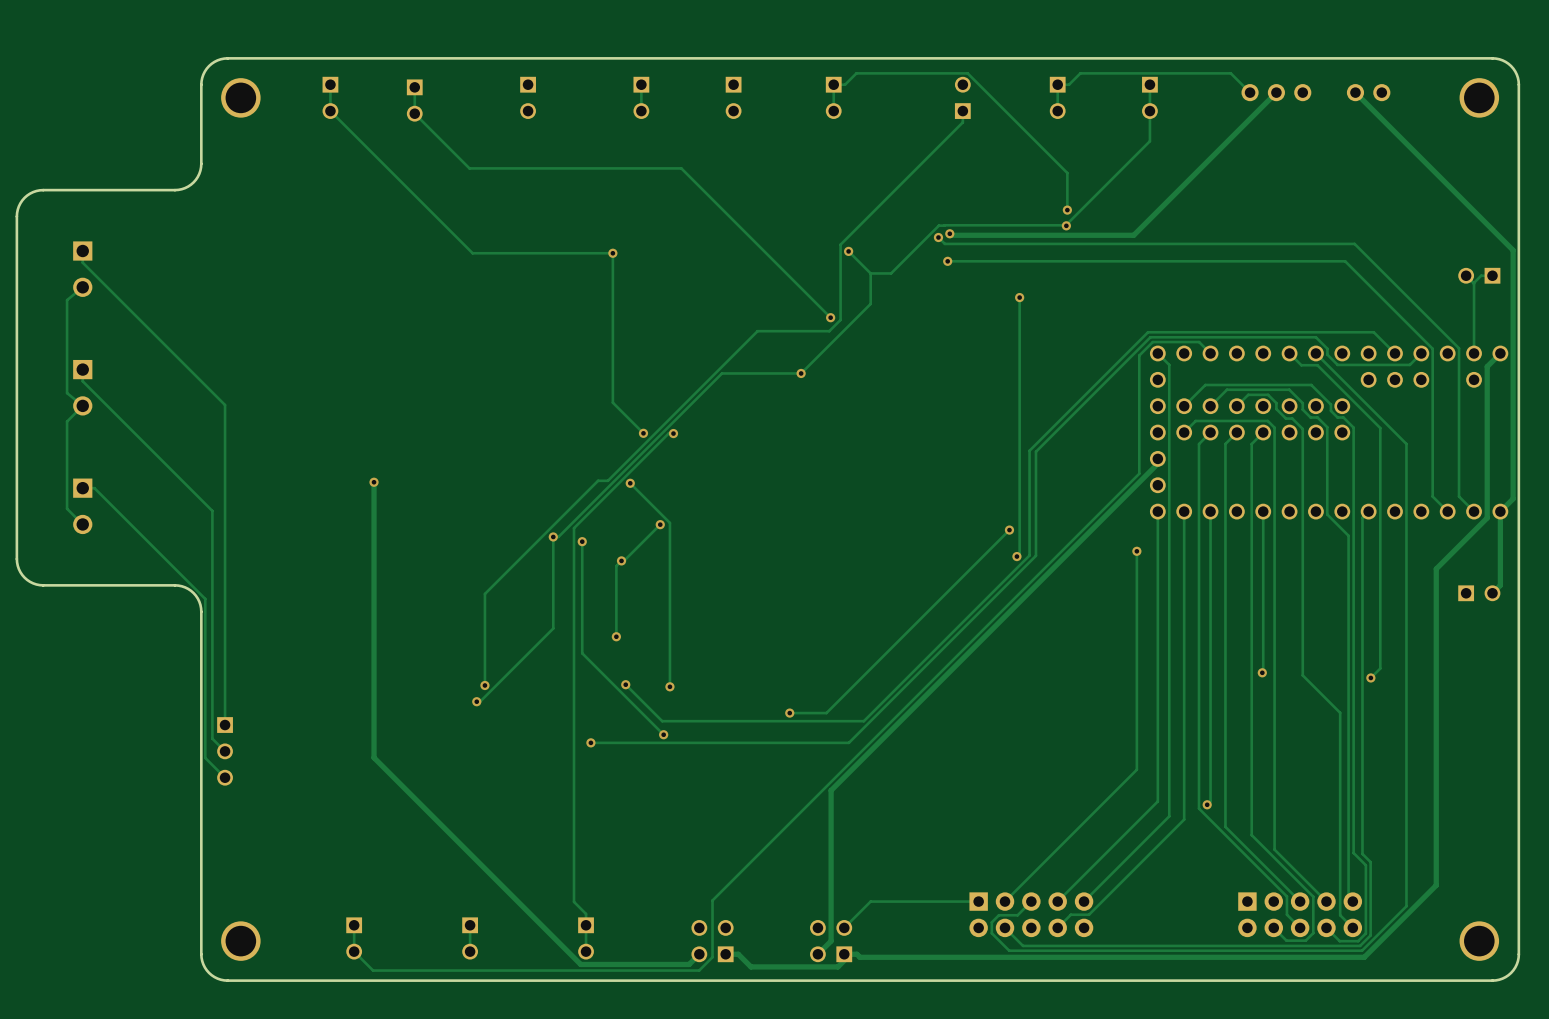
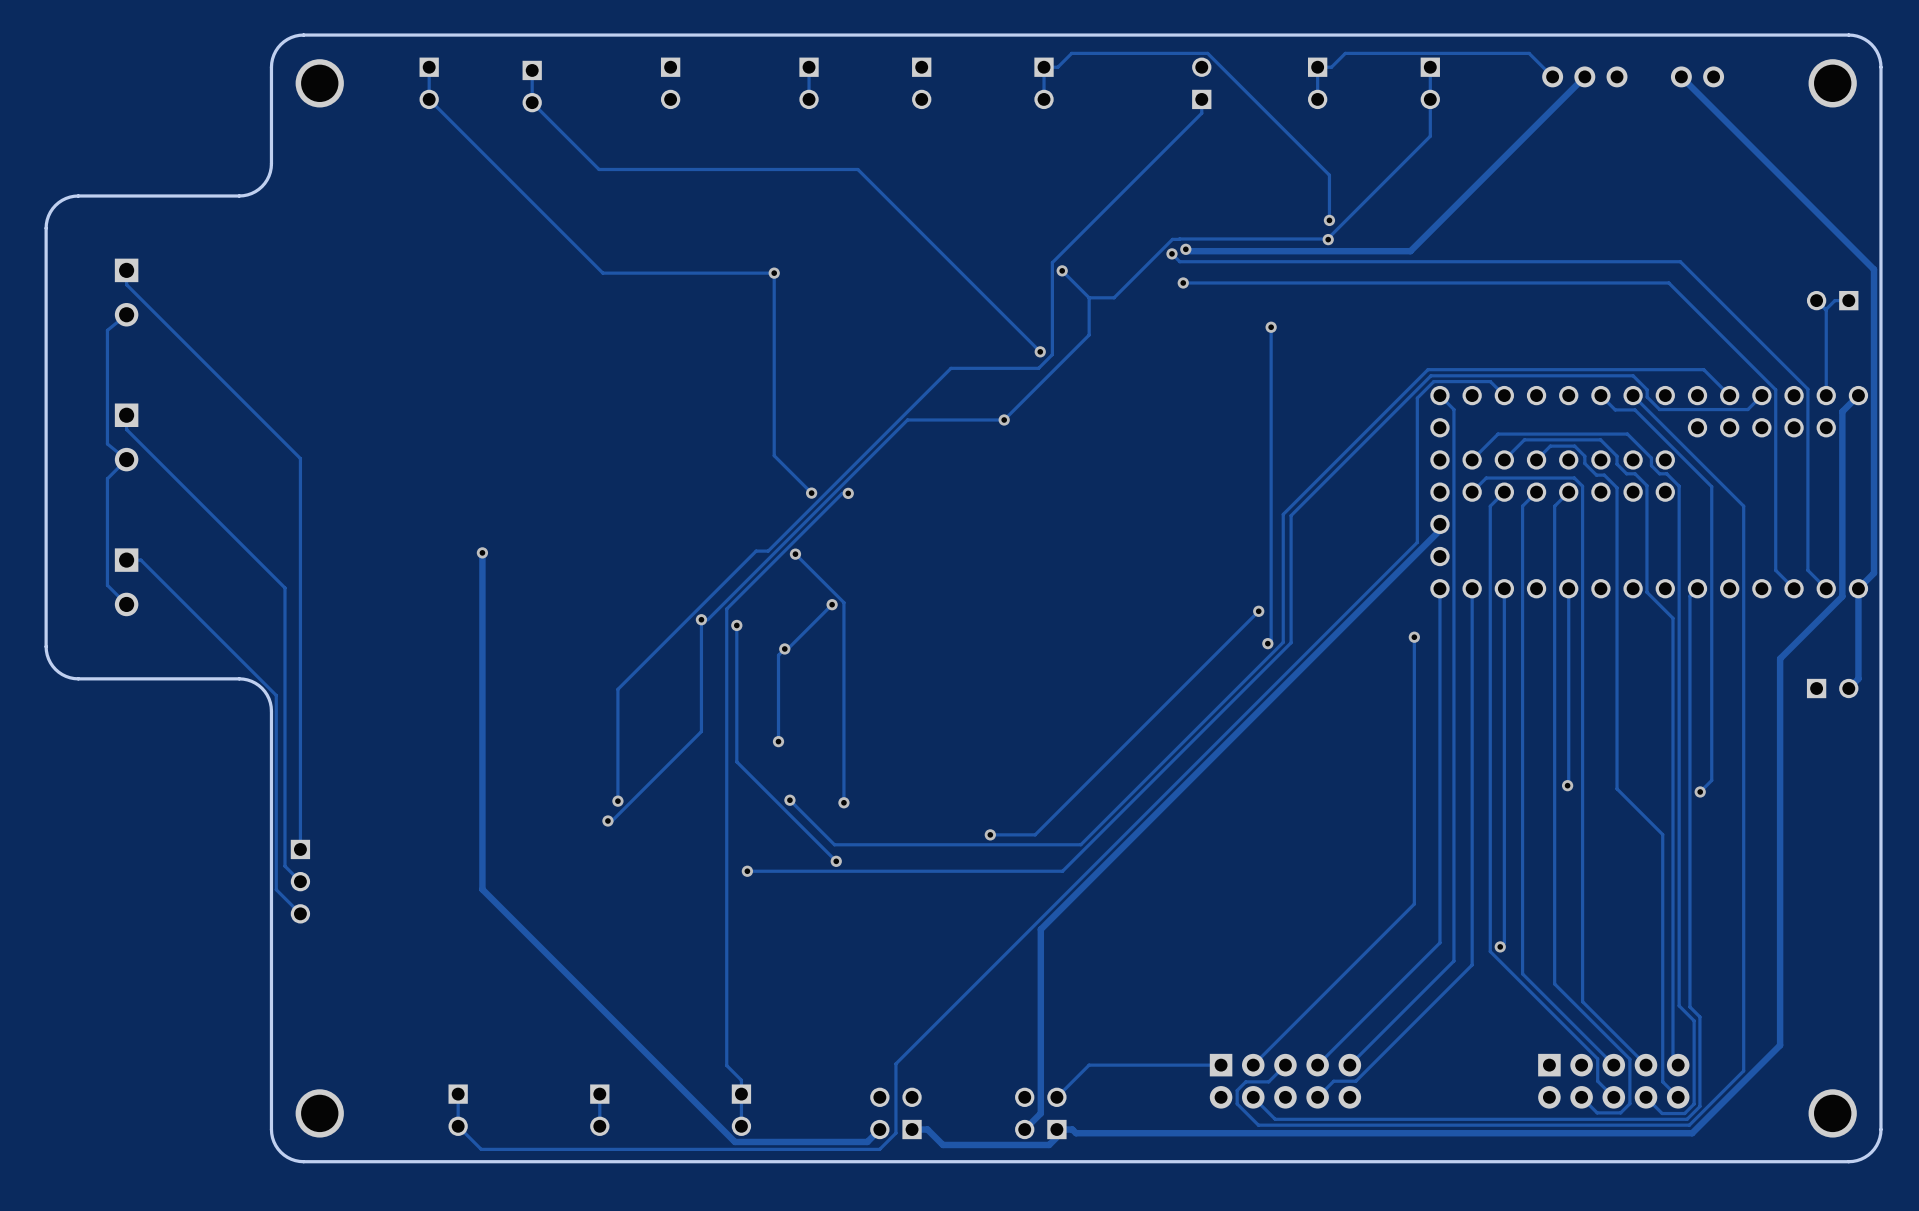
part footprint: [1149, 345, 1509, 520] -> [1430, 385, 1869, 599]

